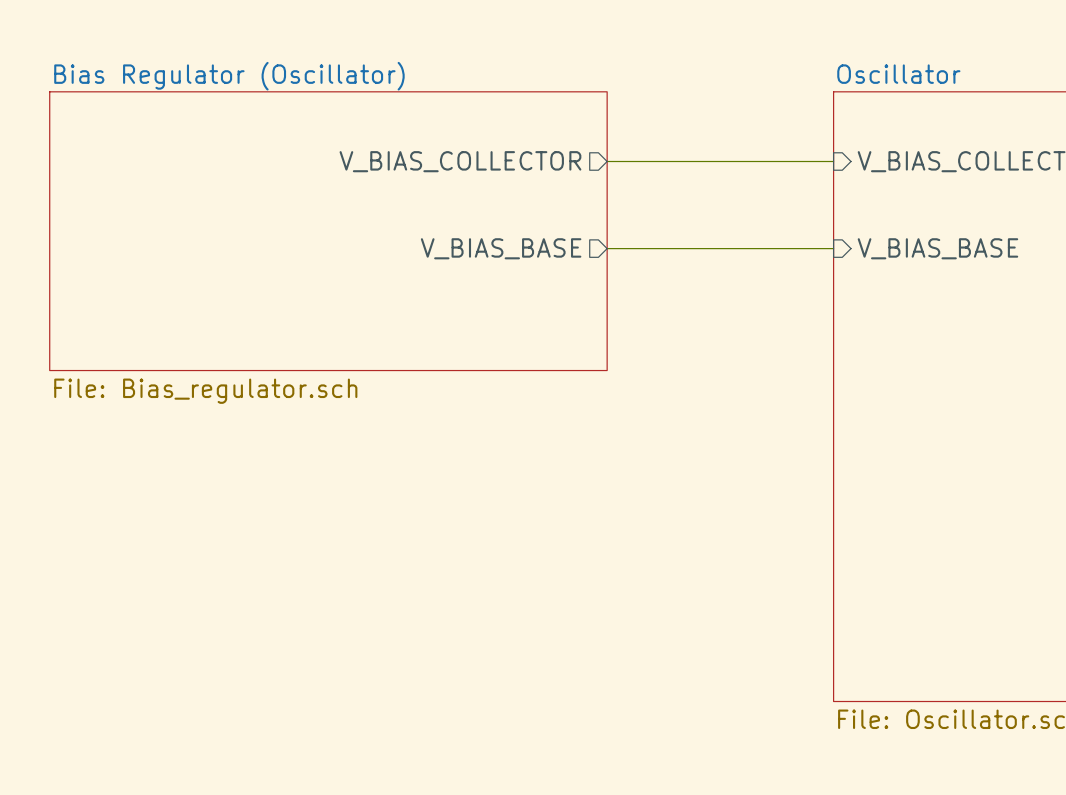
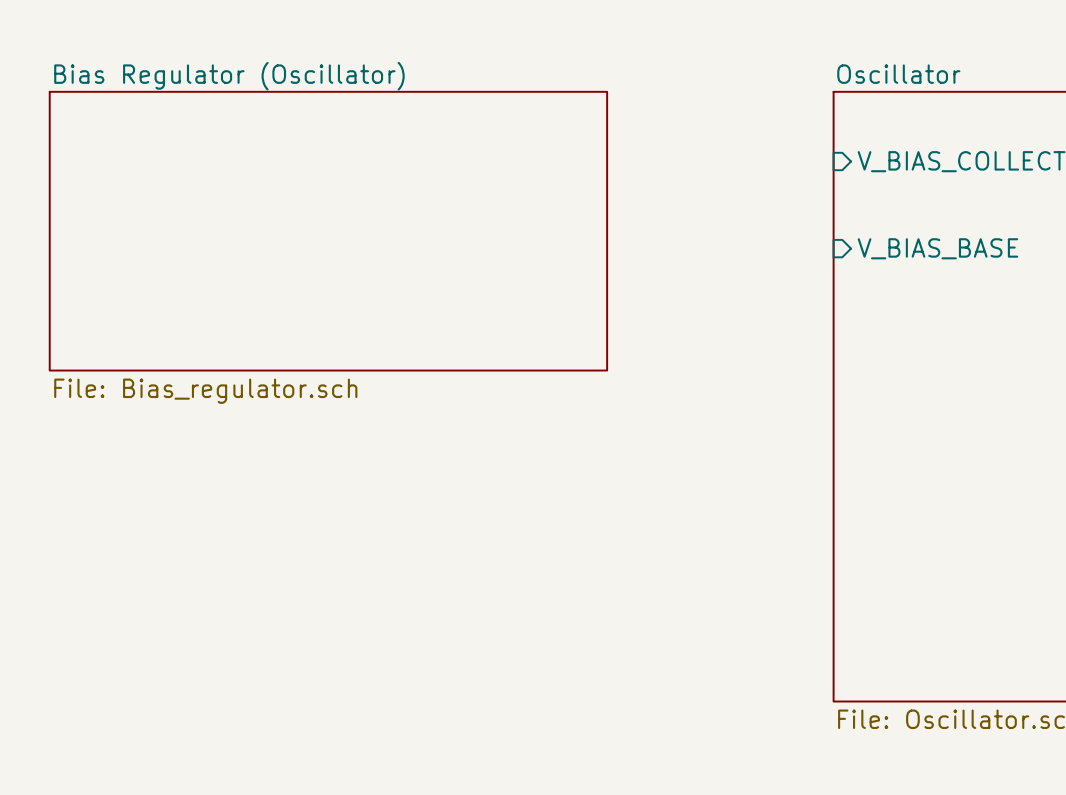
sheet pin: V_BIAS_COLLECTOR (460, 161) -> none
wire: (607, 161) (833, 161) -> none
sheet pin: V_BIAS_BASE (501, 248) -> none
wire: (607, 248) (833, 248) -> none

